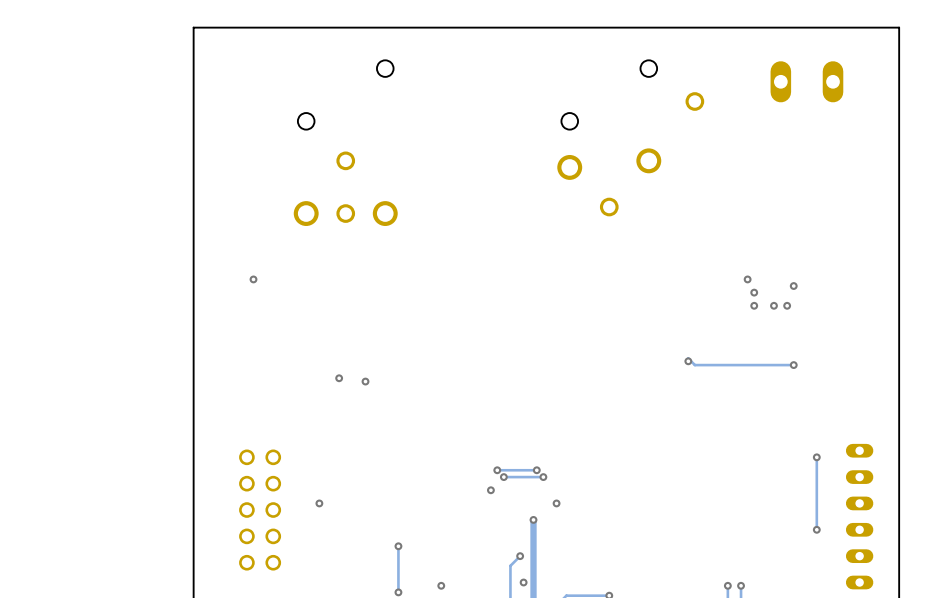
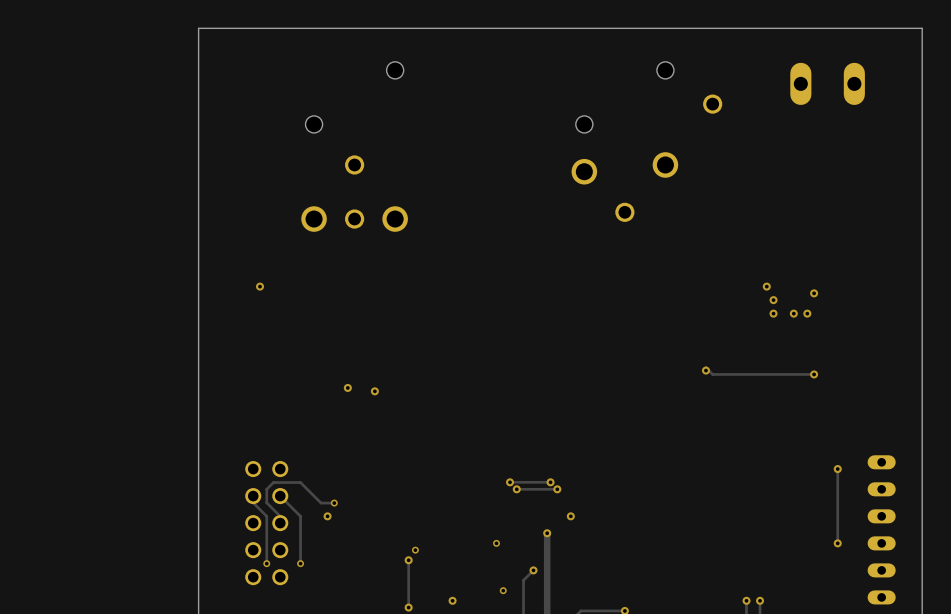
track: none -> (253, 496) (253, 502) (266, 516) (266, 563)
track: none -> (280, 496) (300, 516) (300, 563)
track: none -> (334, 503) (321, 503) (300, 482) (273, 482) (266, 489) (266, 502) (280, 516) (280, 523)
via: none -> (334, 503)
via: (490, 490) -> none
via: none -> (496, 543)
via: none -> (415, 550)
via: none -> (266, 563)
via: none -> (300, 563)
via: none -> (503, 590)
via: (523, 582) -> none

